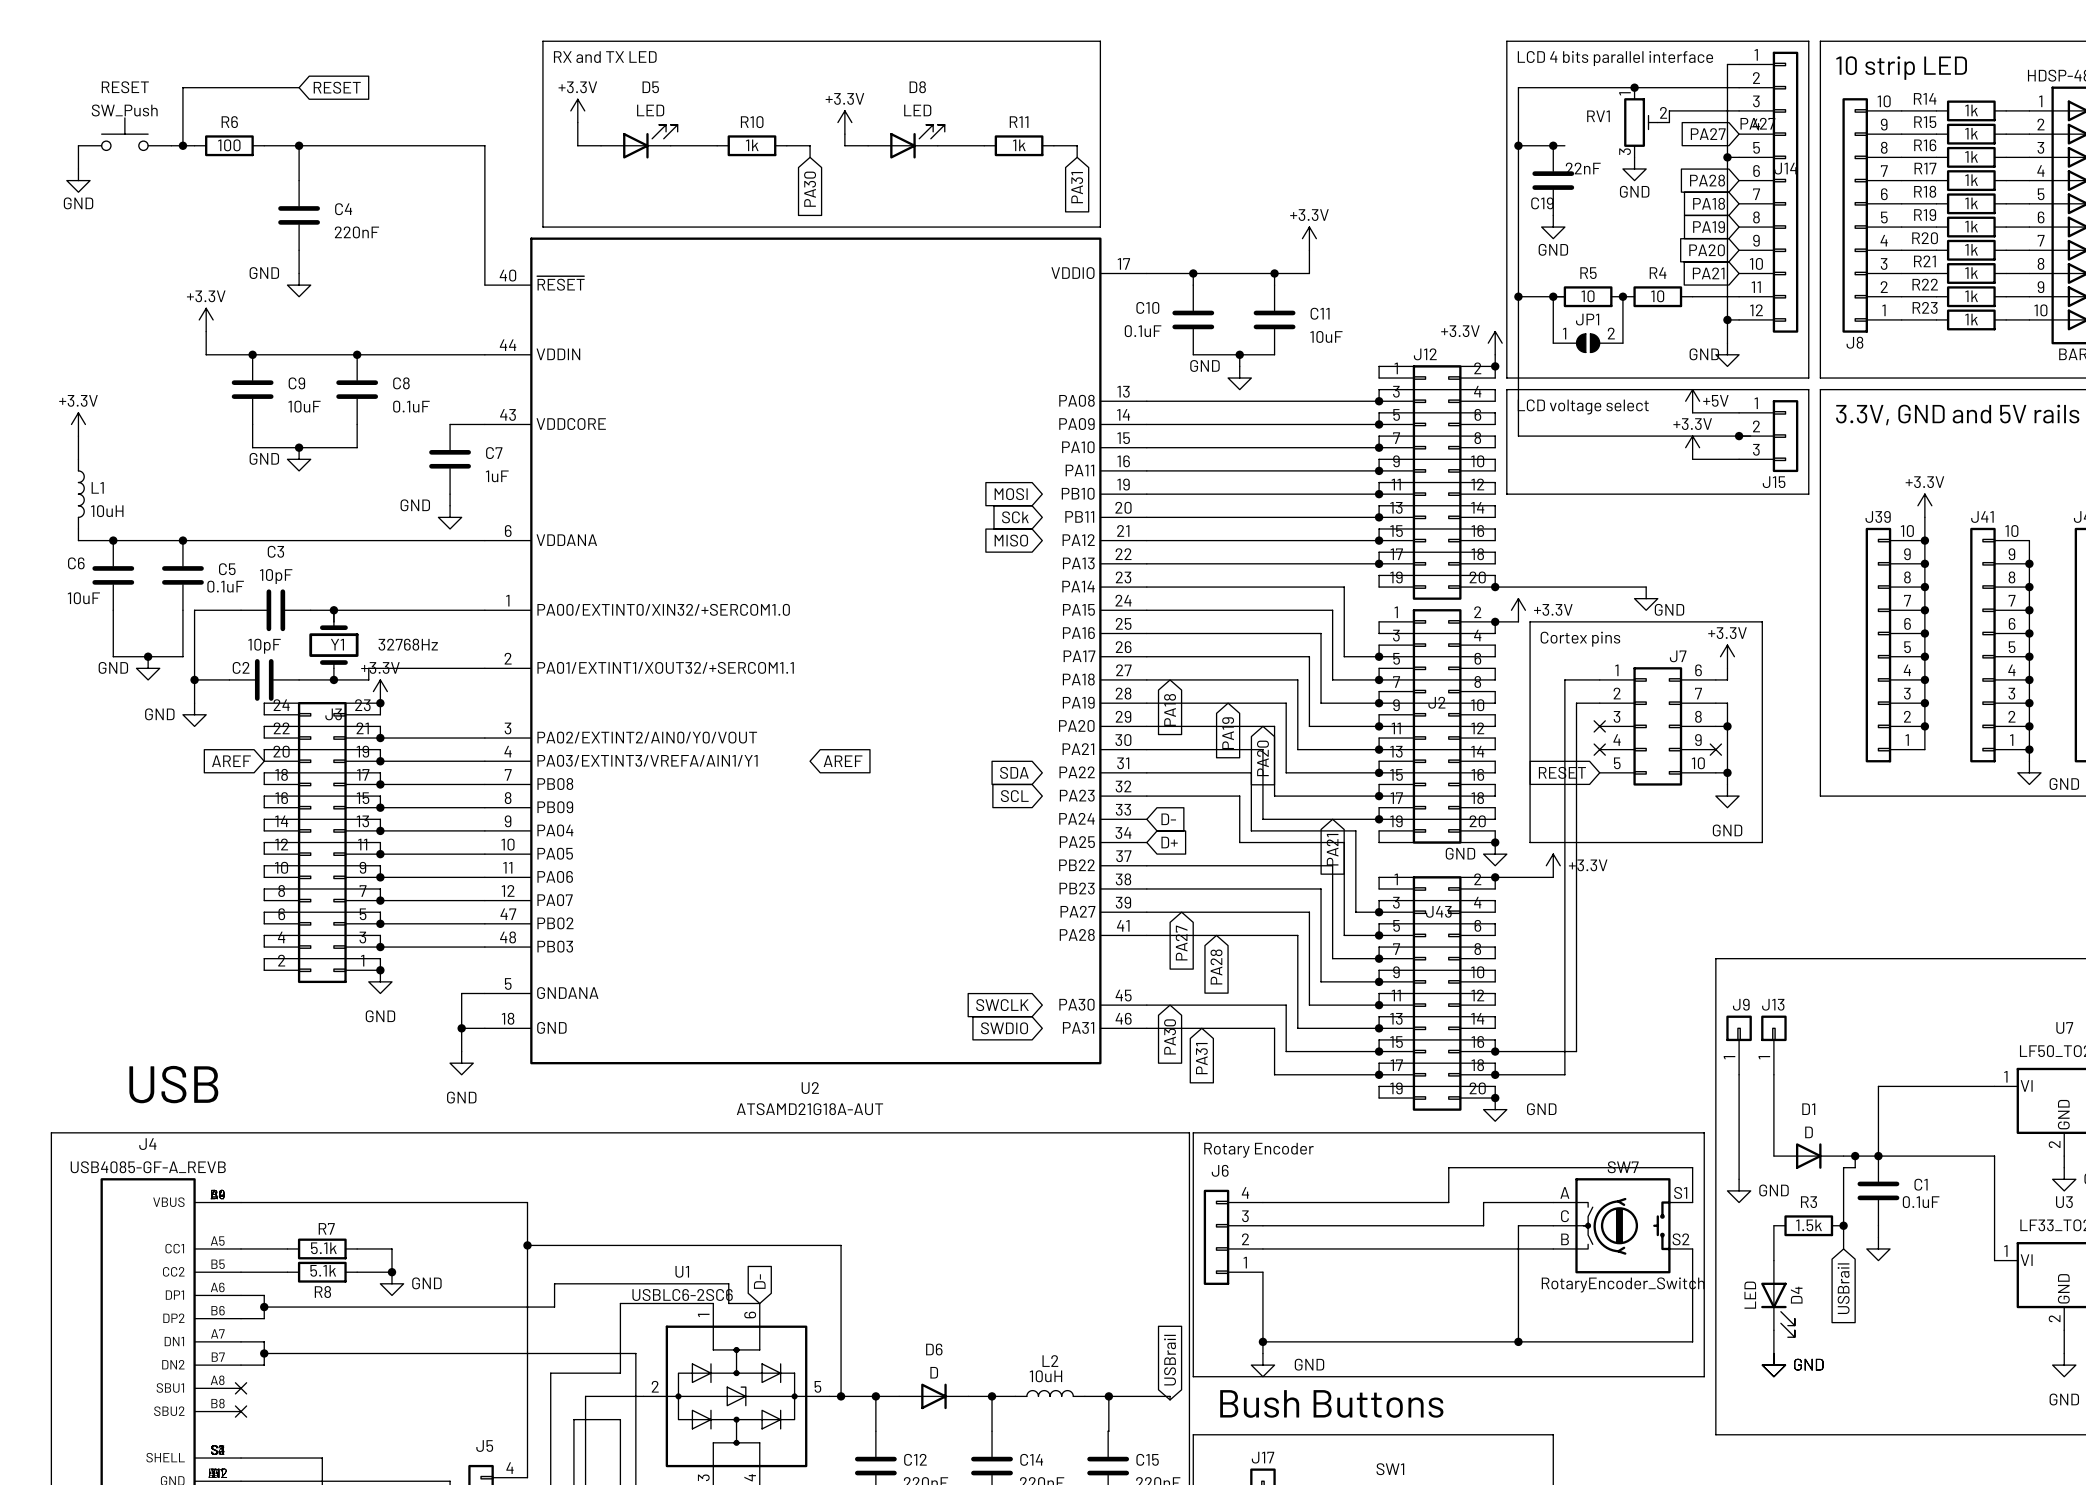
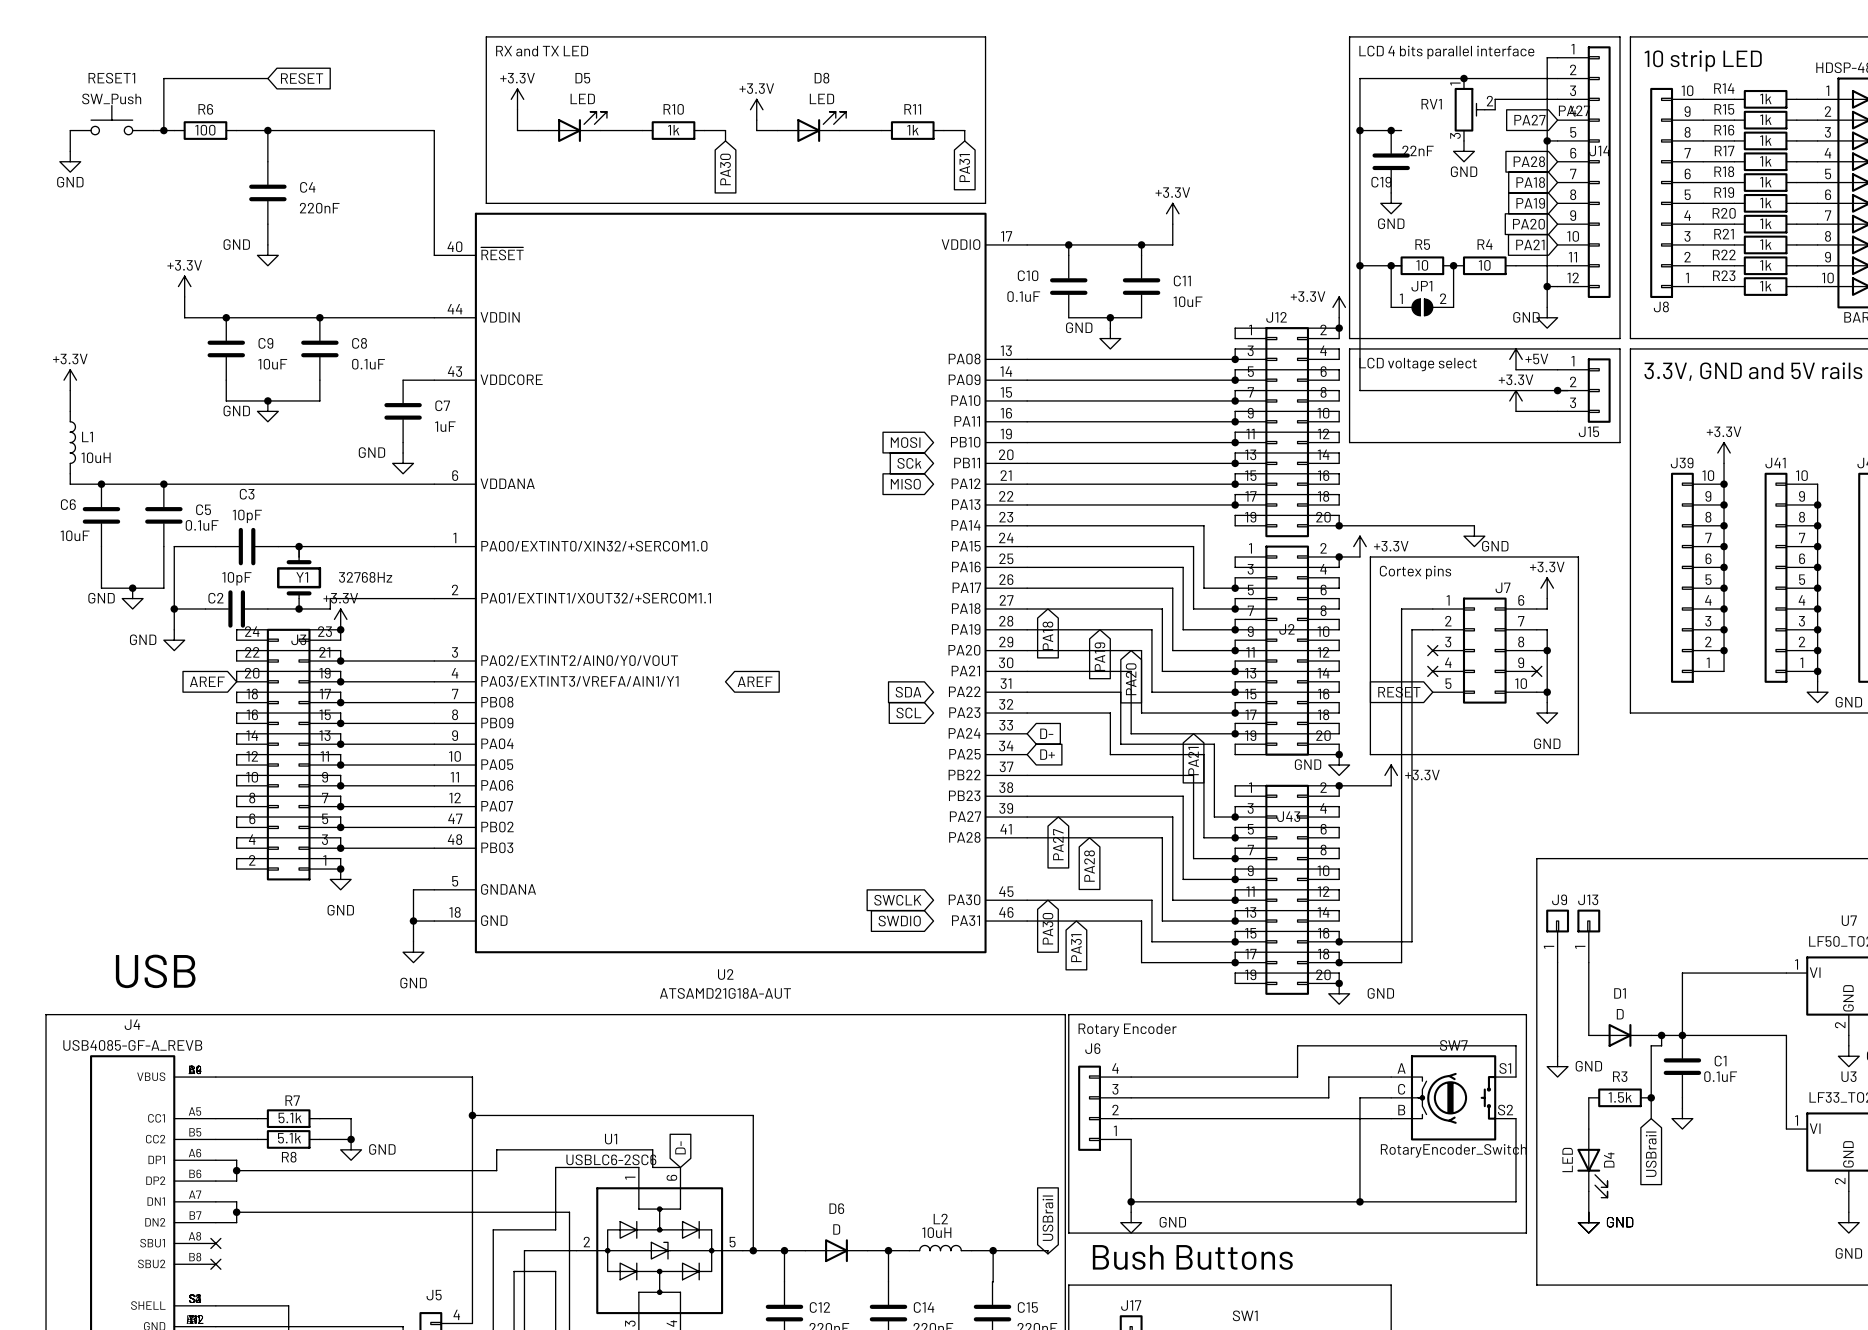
RESET name: RESET (125, 87) -> RESET1 (111, 78)

